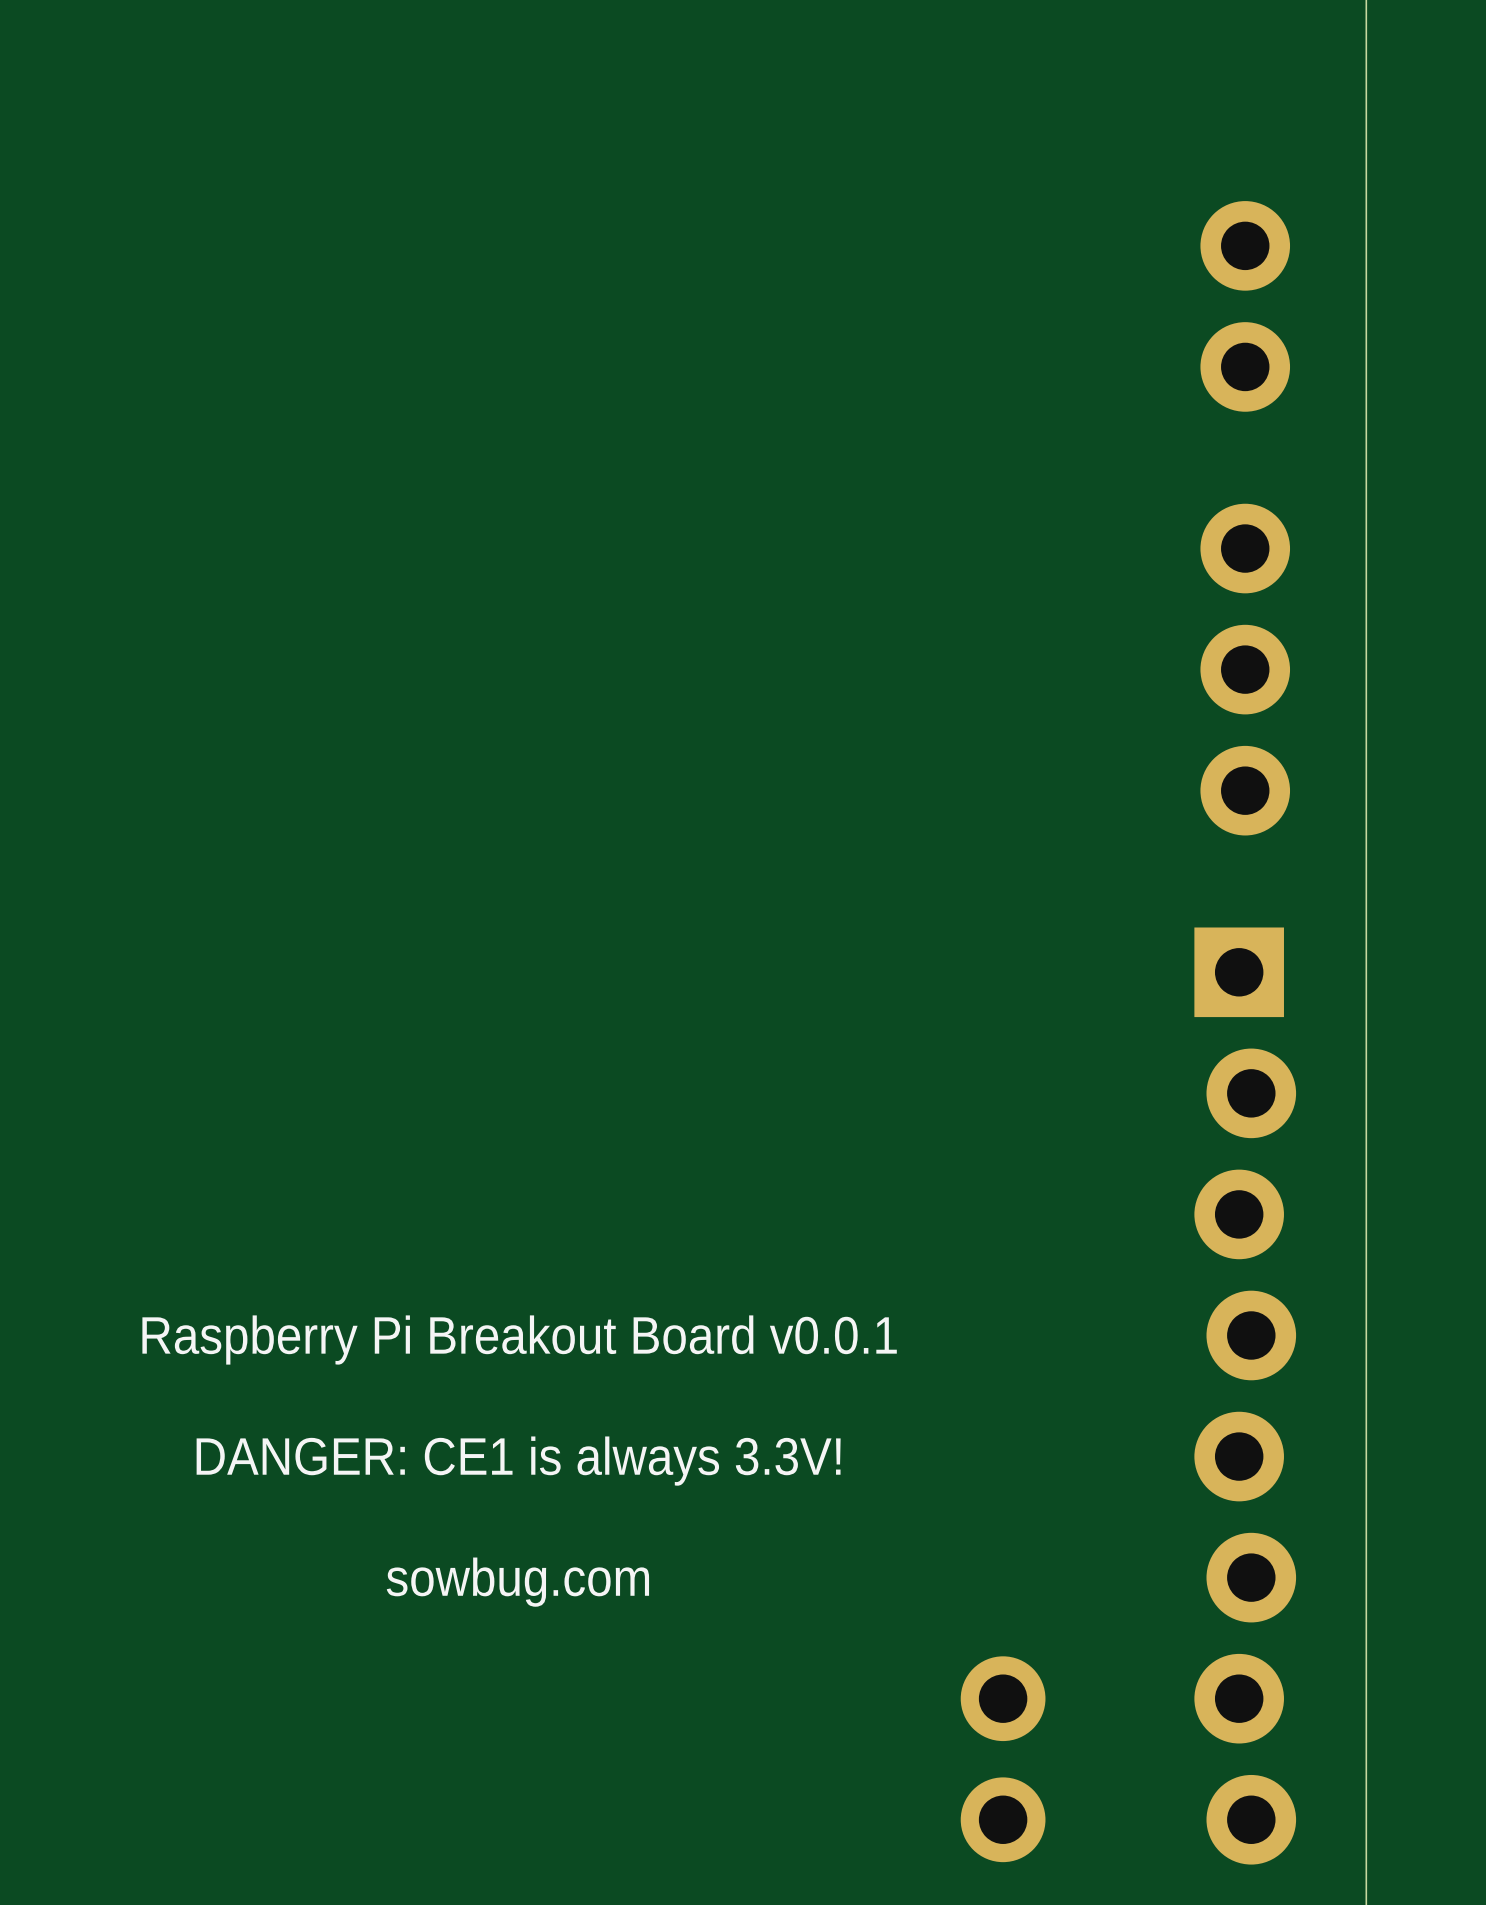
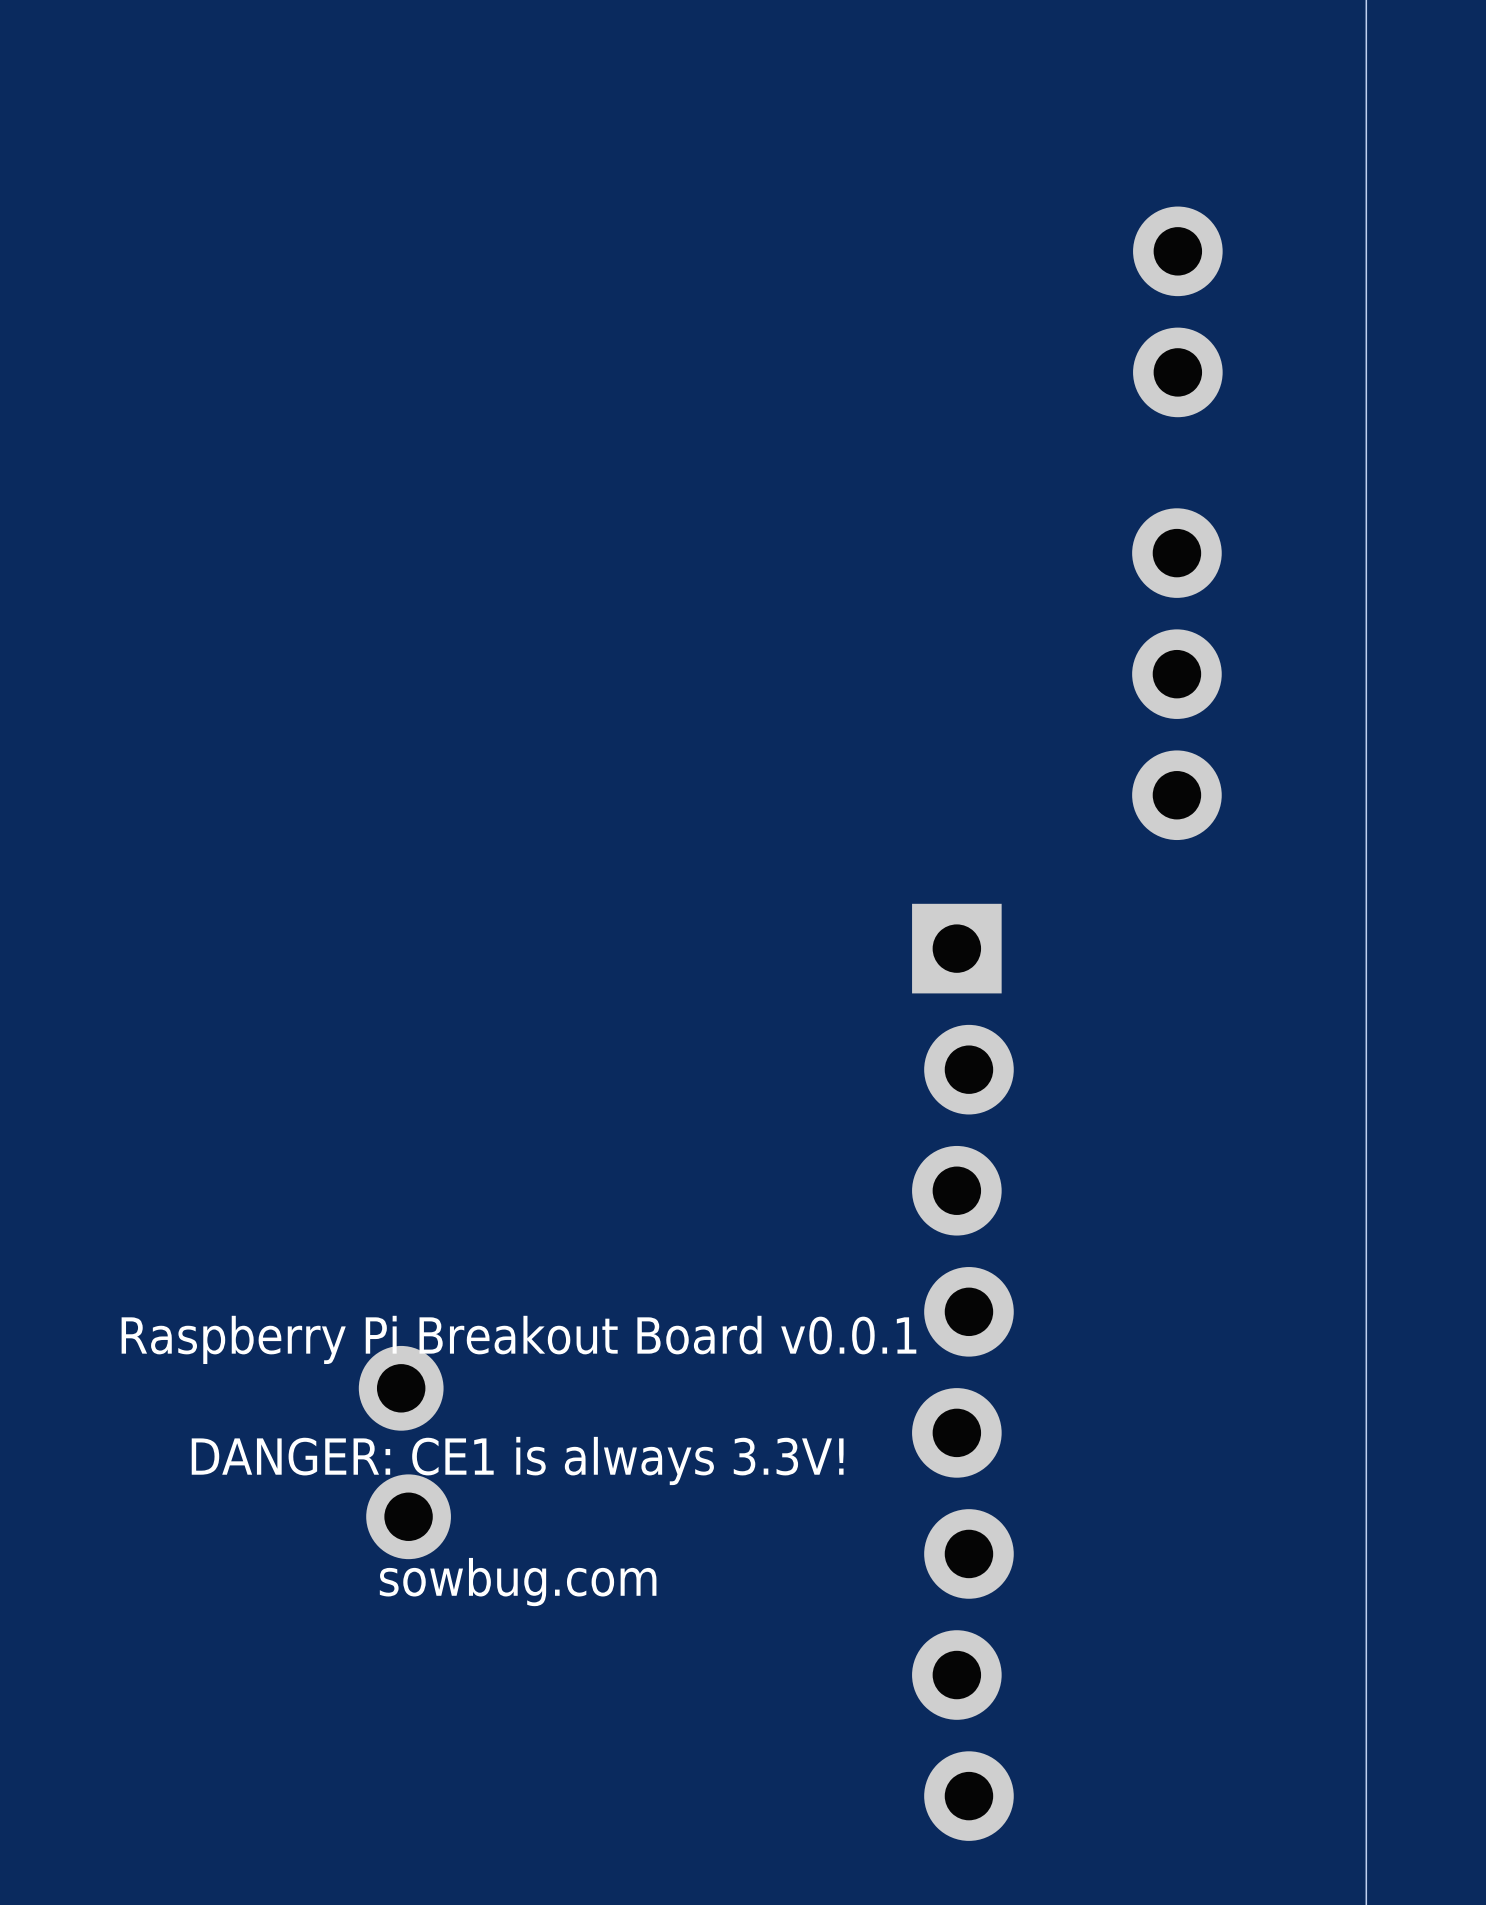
part position: (1245, 306) -> (1177, 311)
part position: (1245, 669) -> (1176, 674)
part: none -> (401, 1388)
part position: (1245, 1396) -> (962, 1372)
part: none -> (408, 1516)
part: (1003, 1698) -> none
part: (1003, 1819) -> none

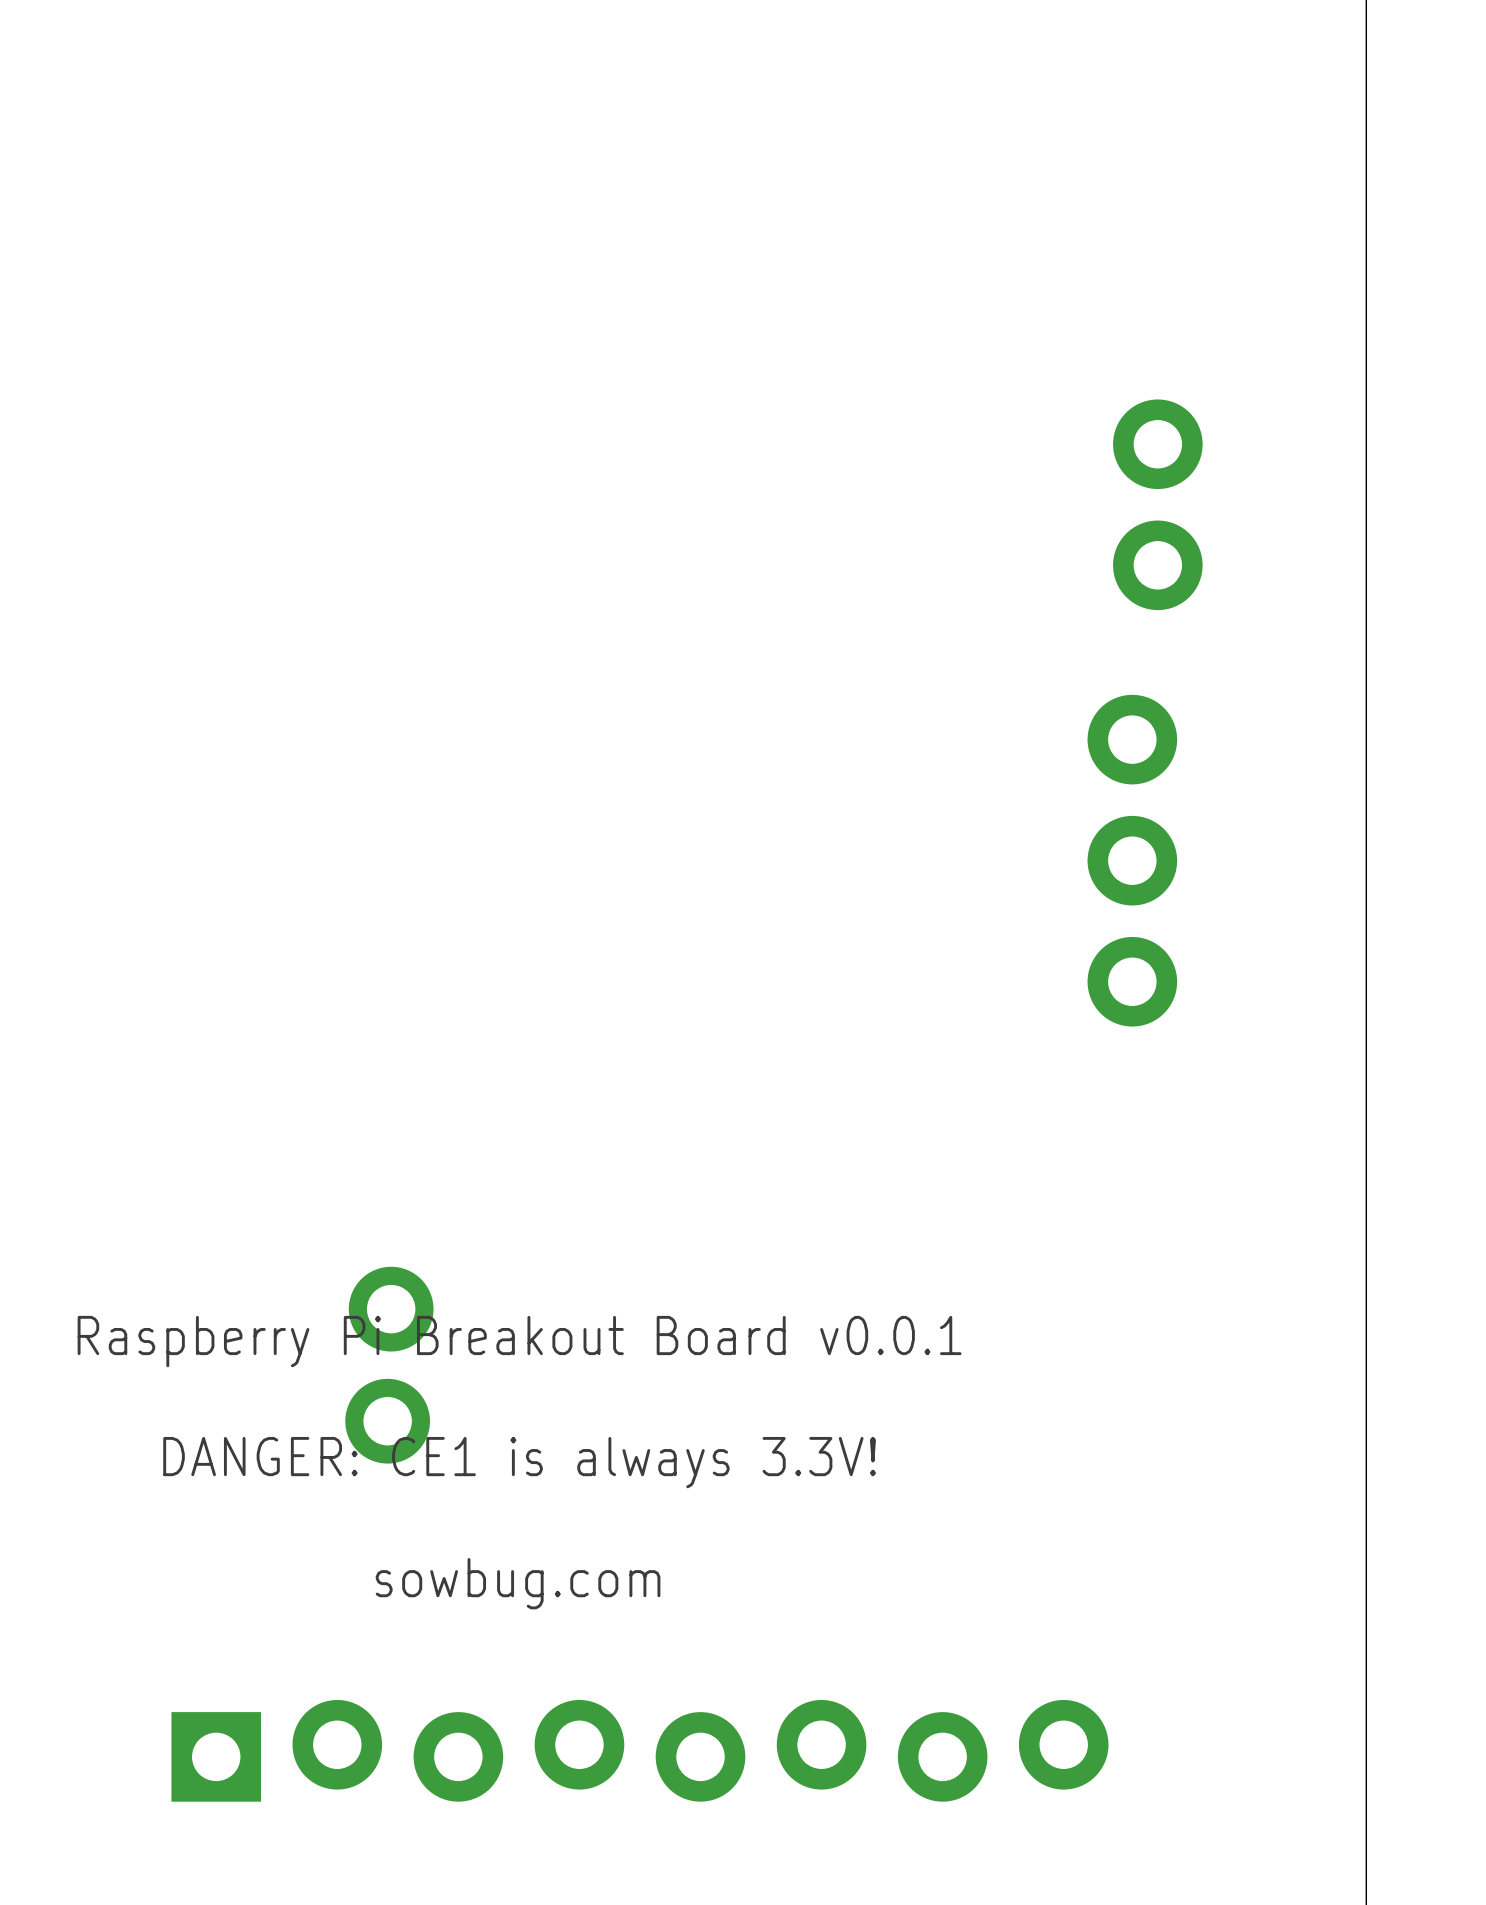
part position: (1177, 311) -> (1157, 504)
part position: (1176, 674) -> (1132, 860)
part rotation: 0° (962, 1372) -> 90° counterclockwise (639, 1750)
part position: (401, 1388) -> (387, 1421)
part position: (408, 1516) -> (391, 1309)

